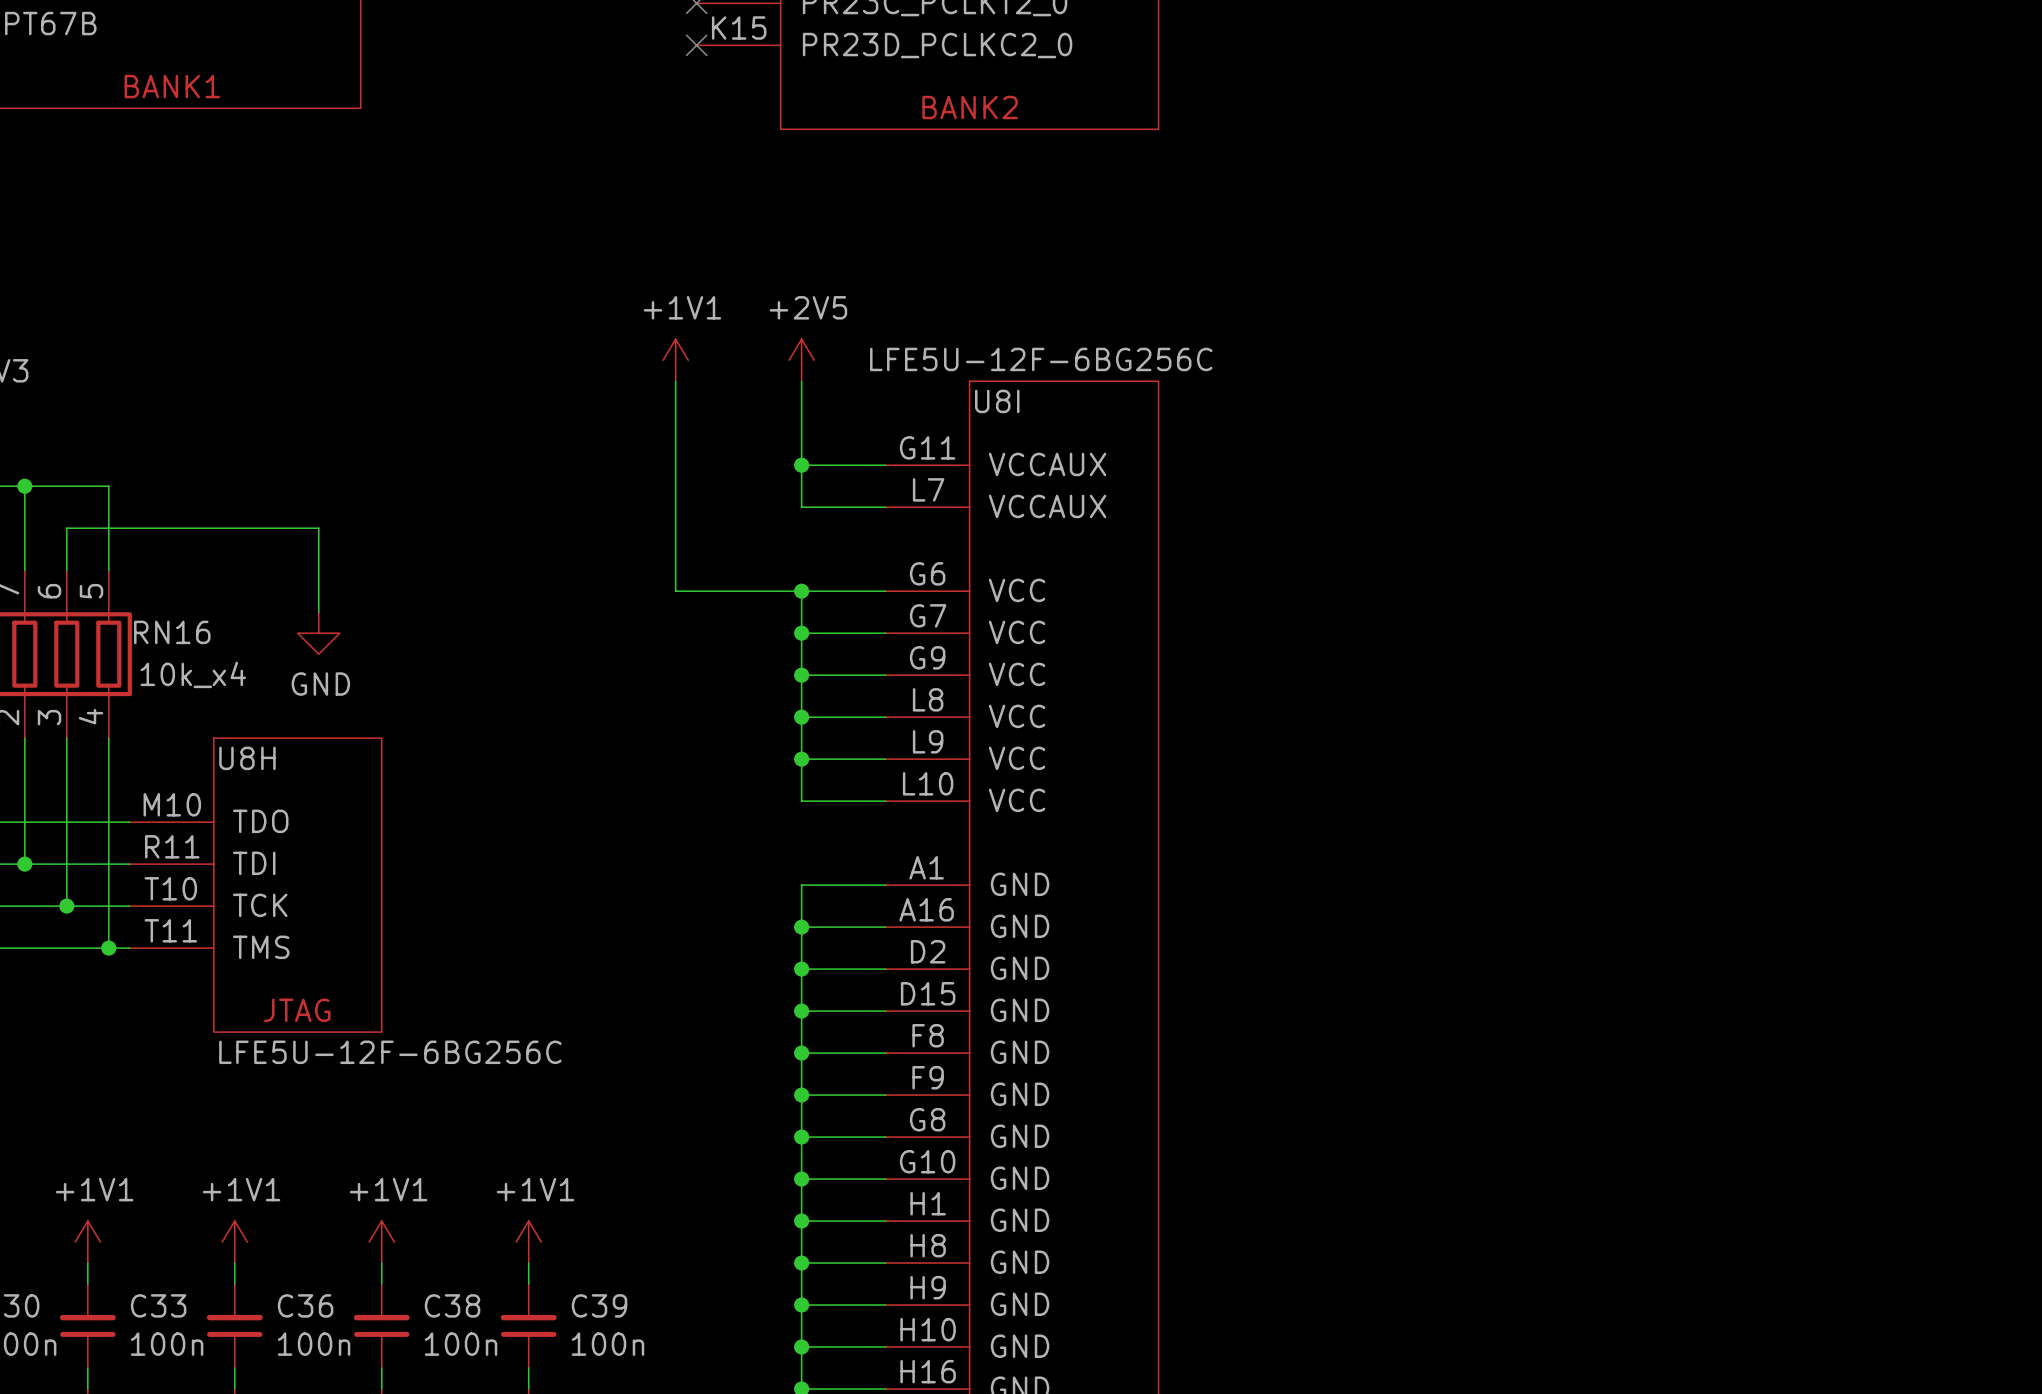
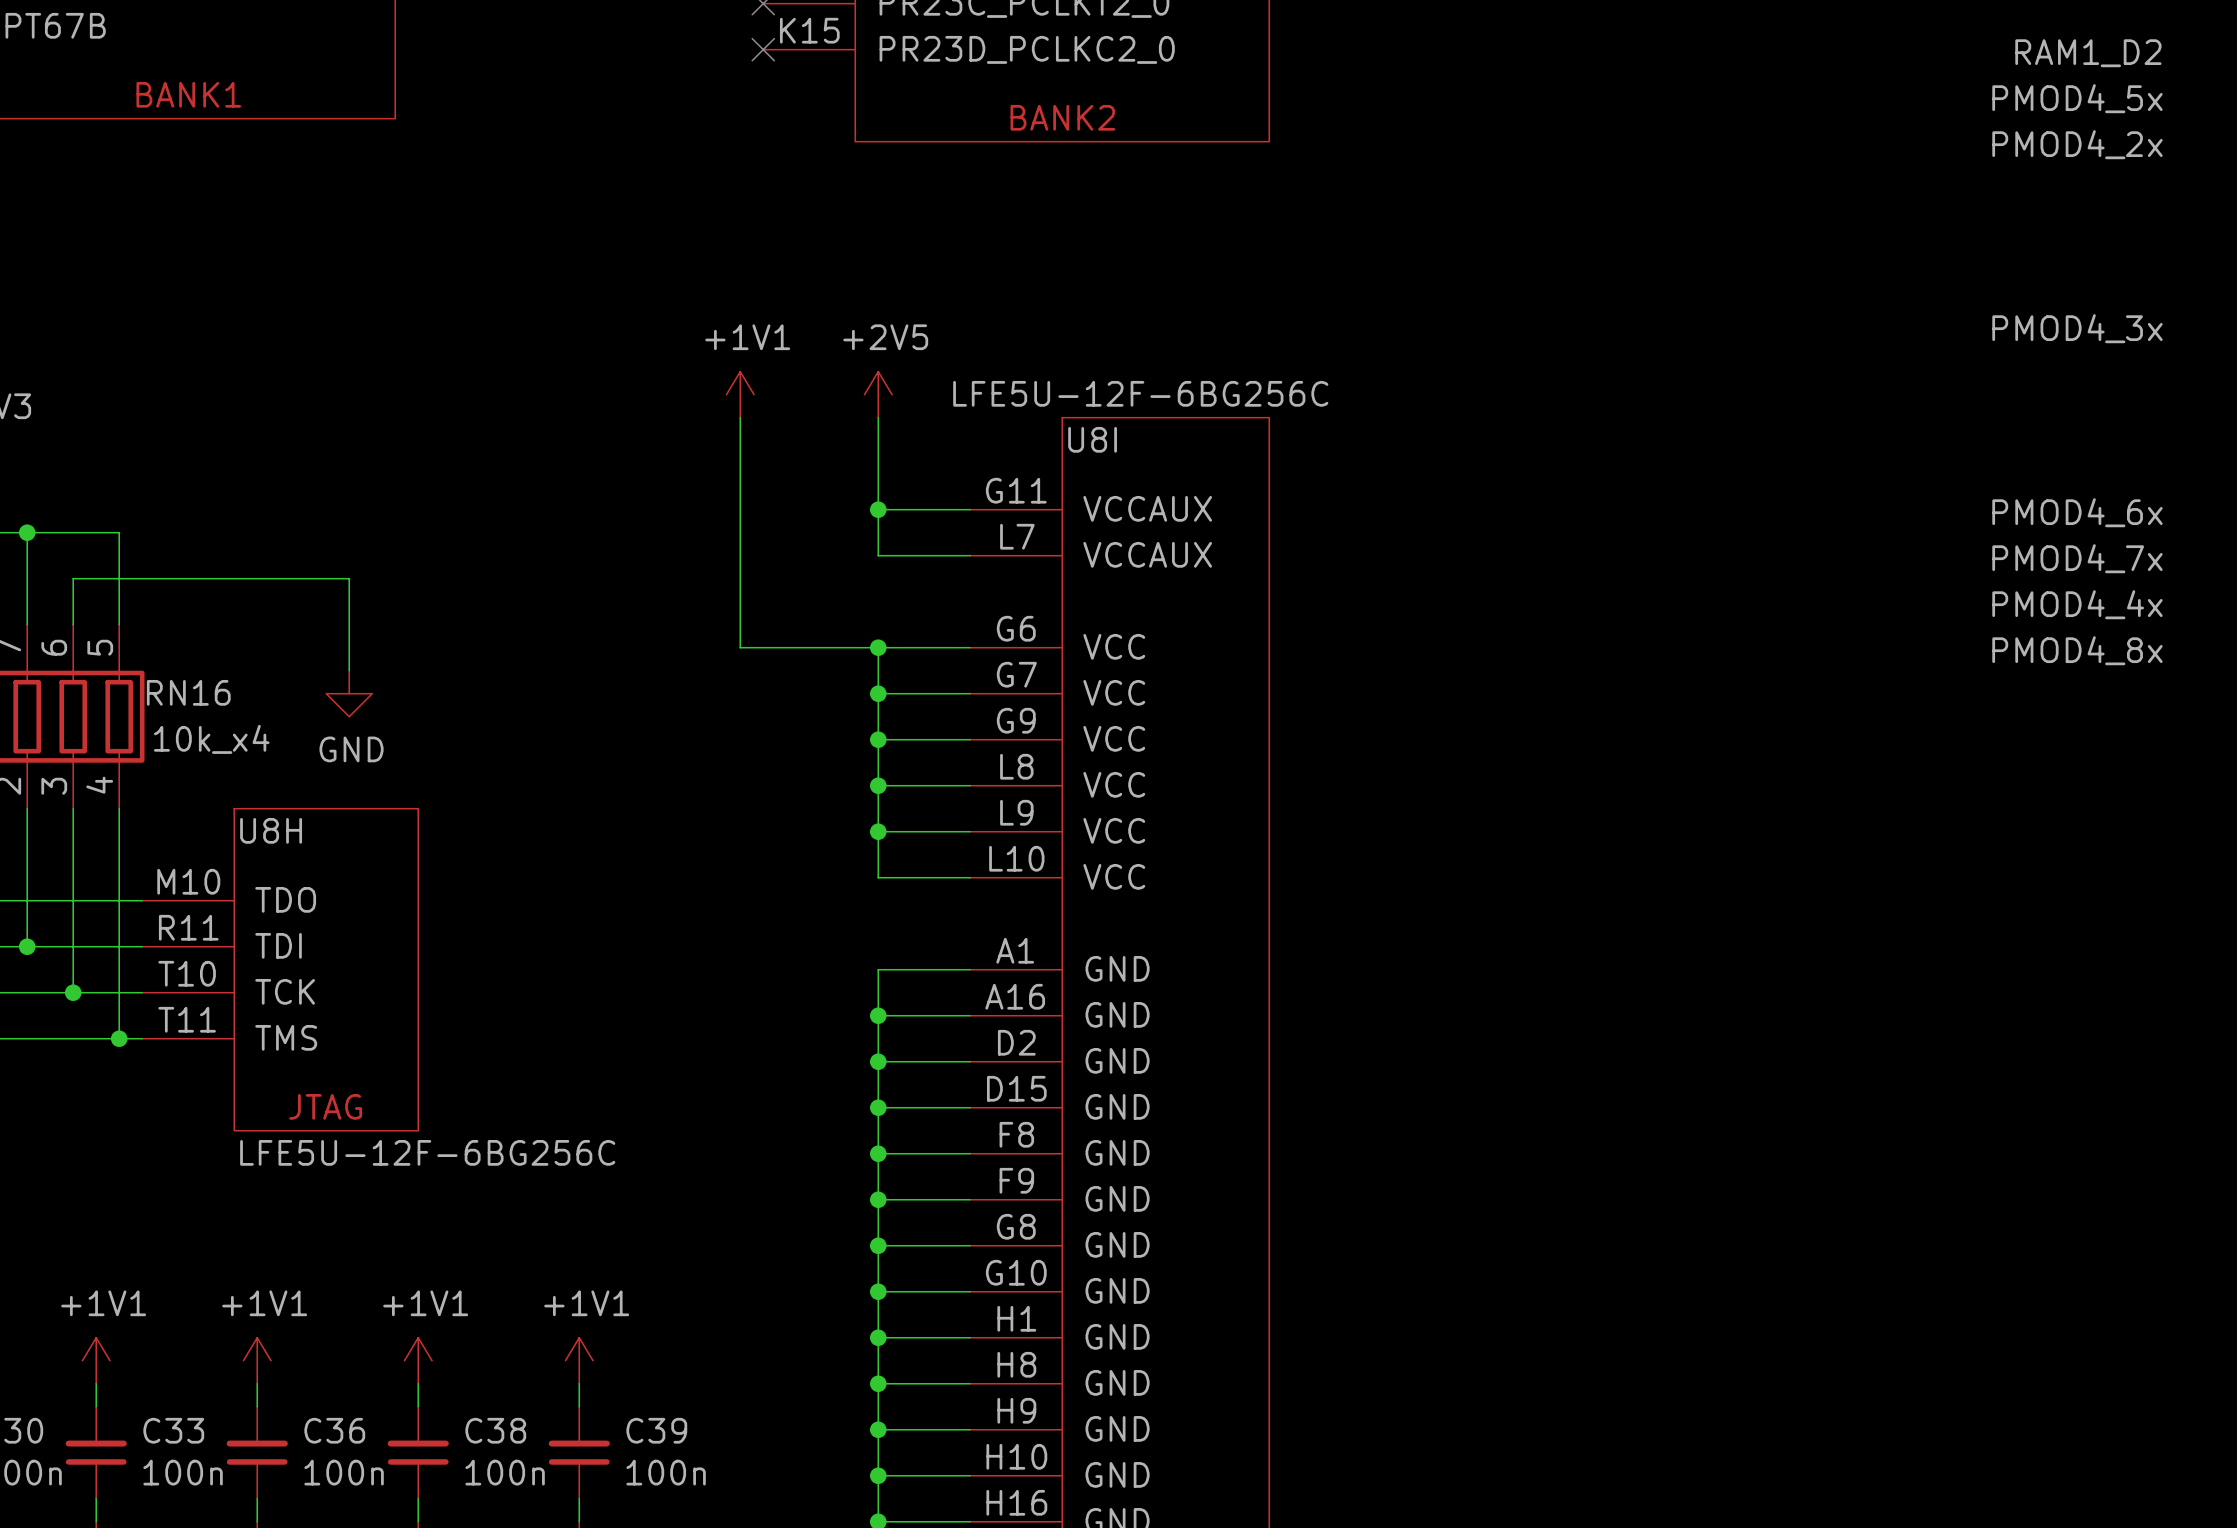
label: none -> RAM1_D2 (2088, 53)
label: none -> PMOD4_5x (2077, 98)
label: none -> PMOD4_2x (2077, 144)
label: none -> PMOD4_3x (2077, 328)
label: none -> PMOD4_6x (2077, 512)
label: none -> PMOD4_7x (2077, 558)
label: none -> PMOD4_4x (2077, 604)
label: none -> PMOD4_8x (2077, 650)

